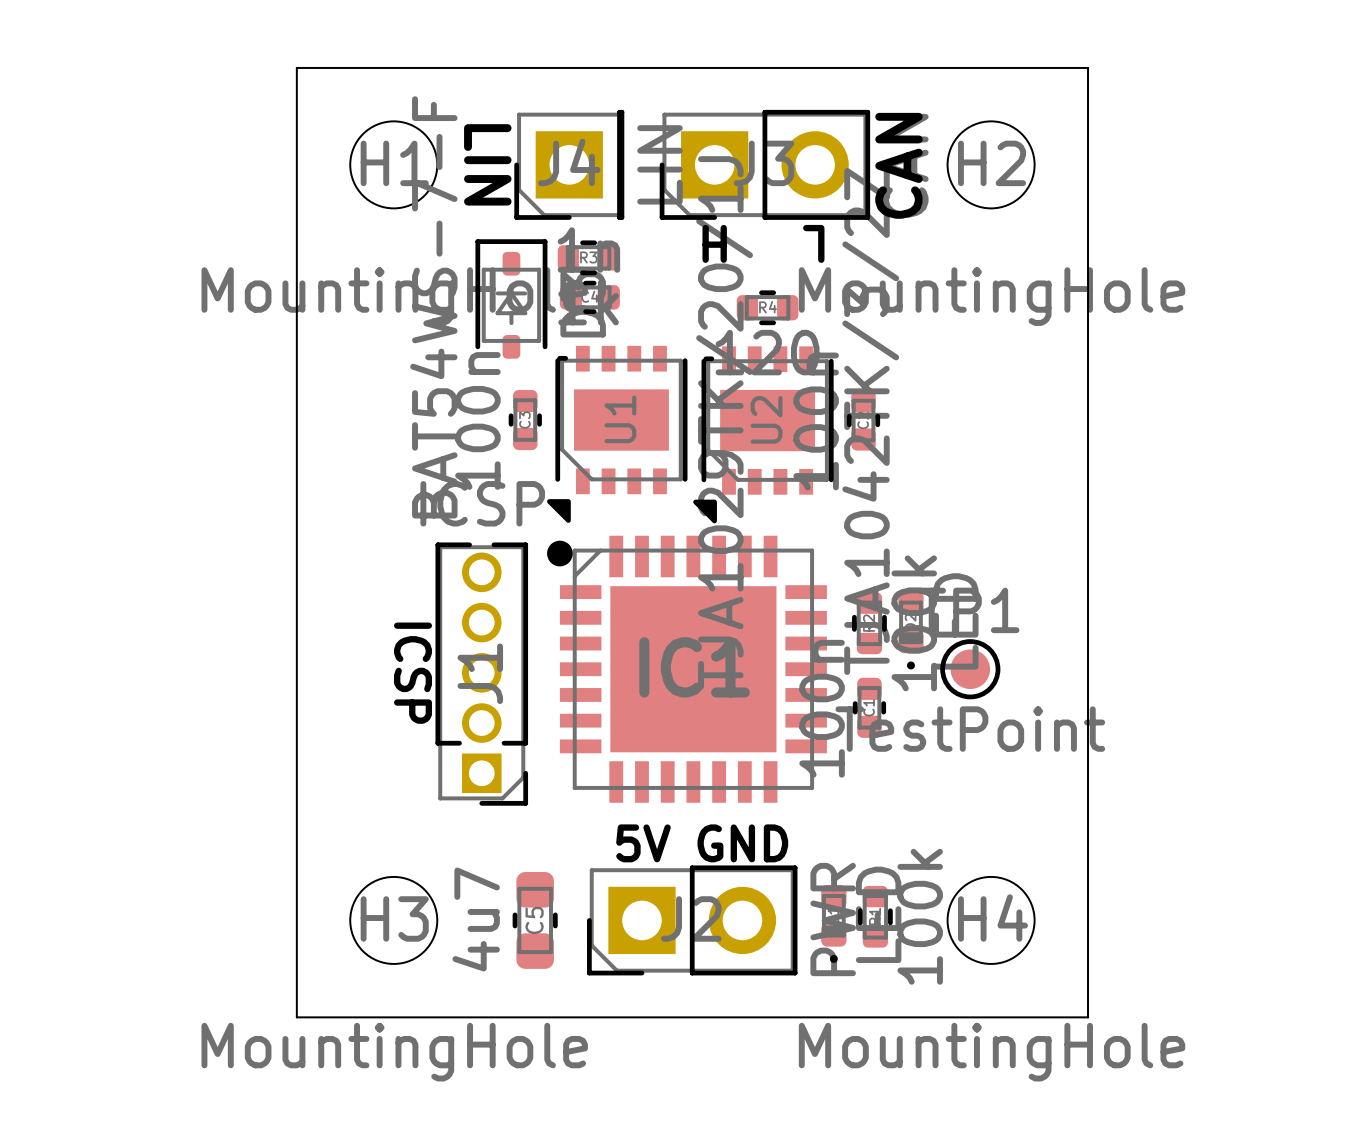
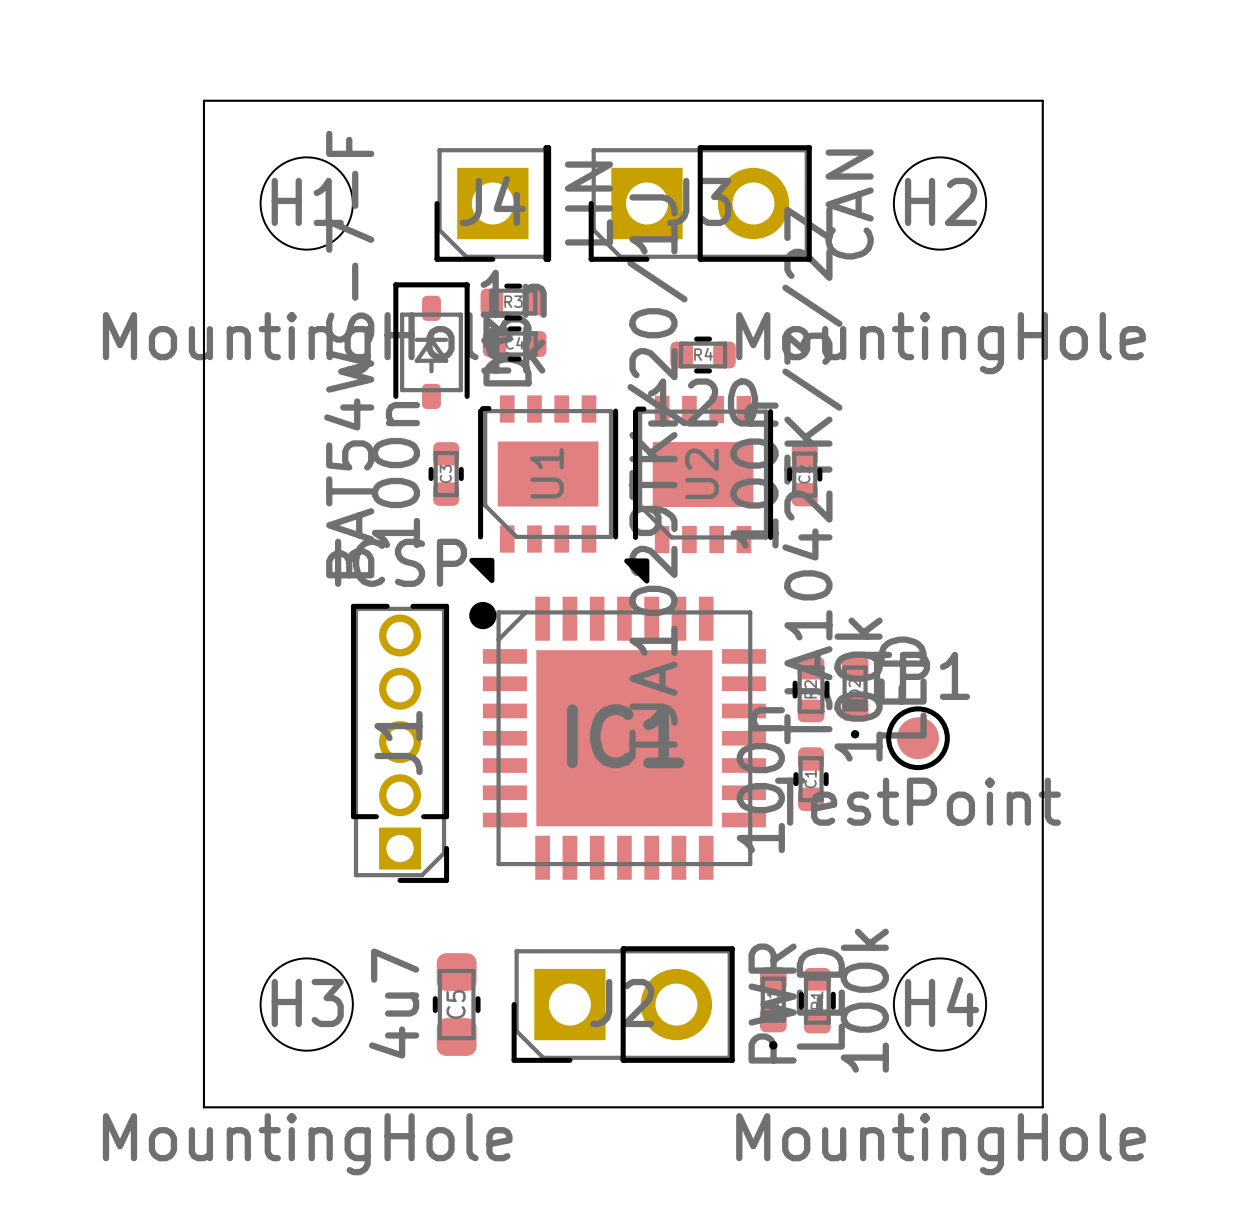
text: LIN (487, 164) -> none
text: CAN (899, 165) -> none
text: H (714, 243) -> none
text: L (813, 243) -> none
text: ICSP (413, 673) -> none
text: 5V (643, 843) -> none
text: GND (742, 843) -> none

